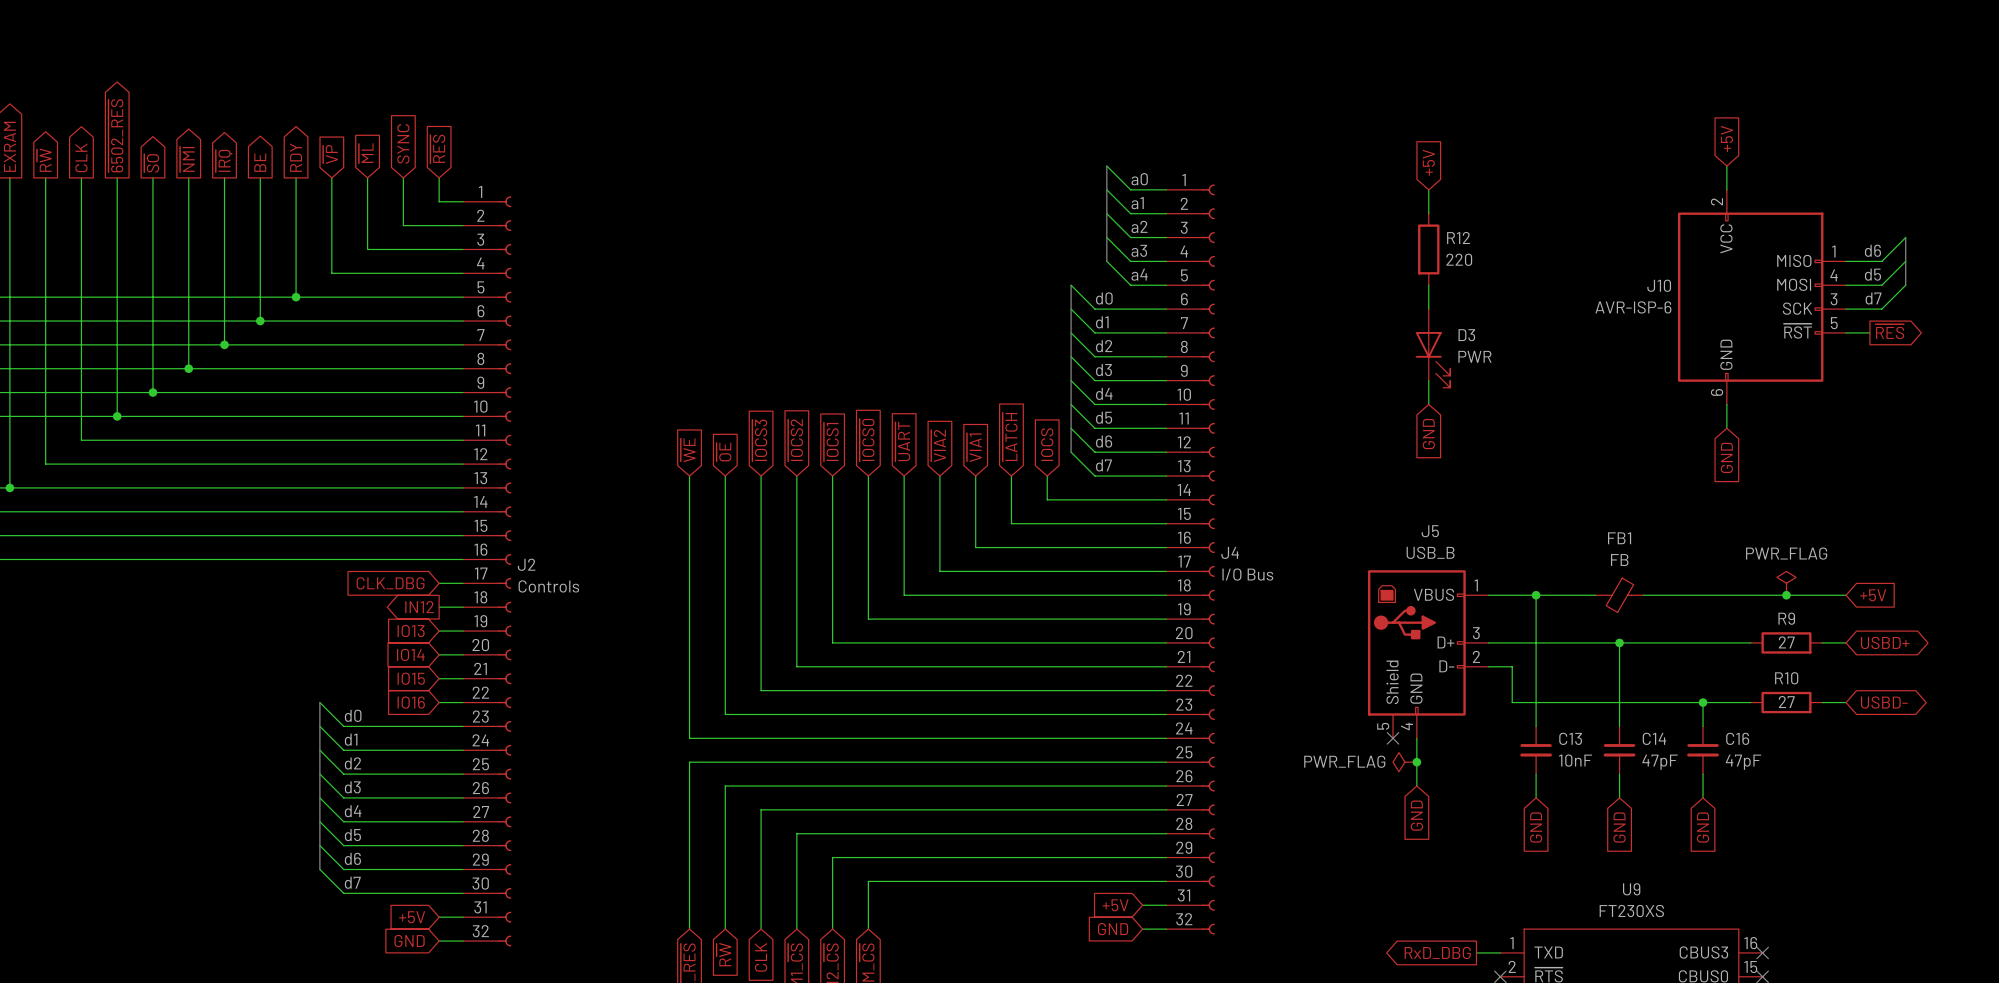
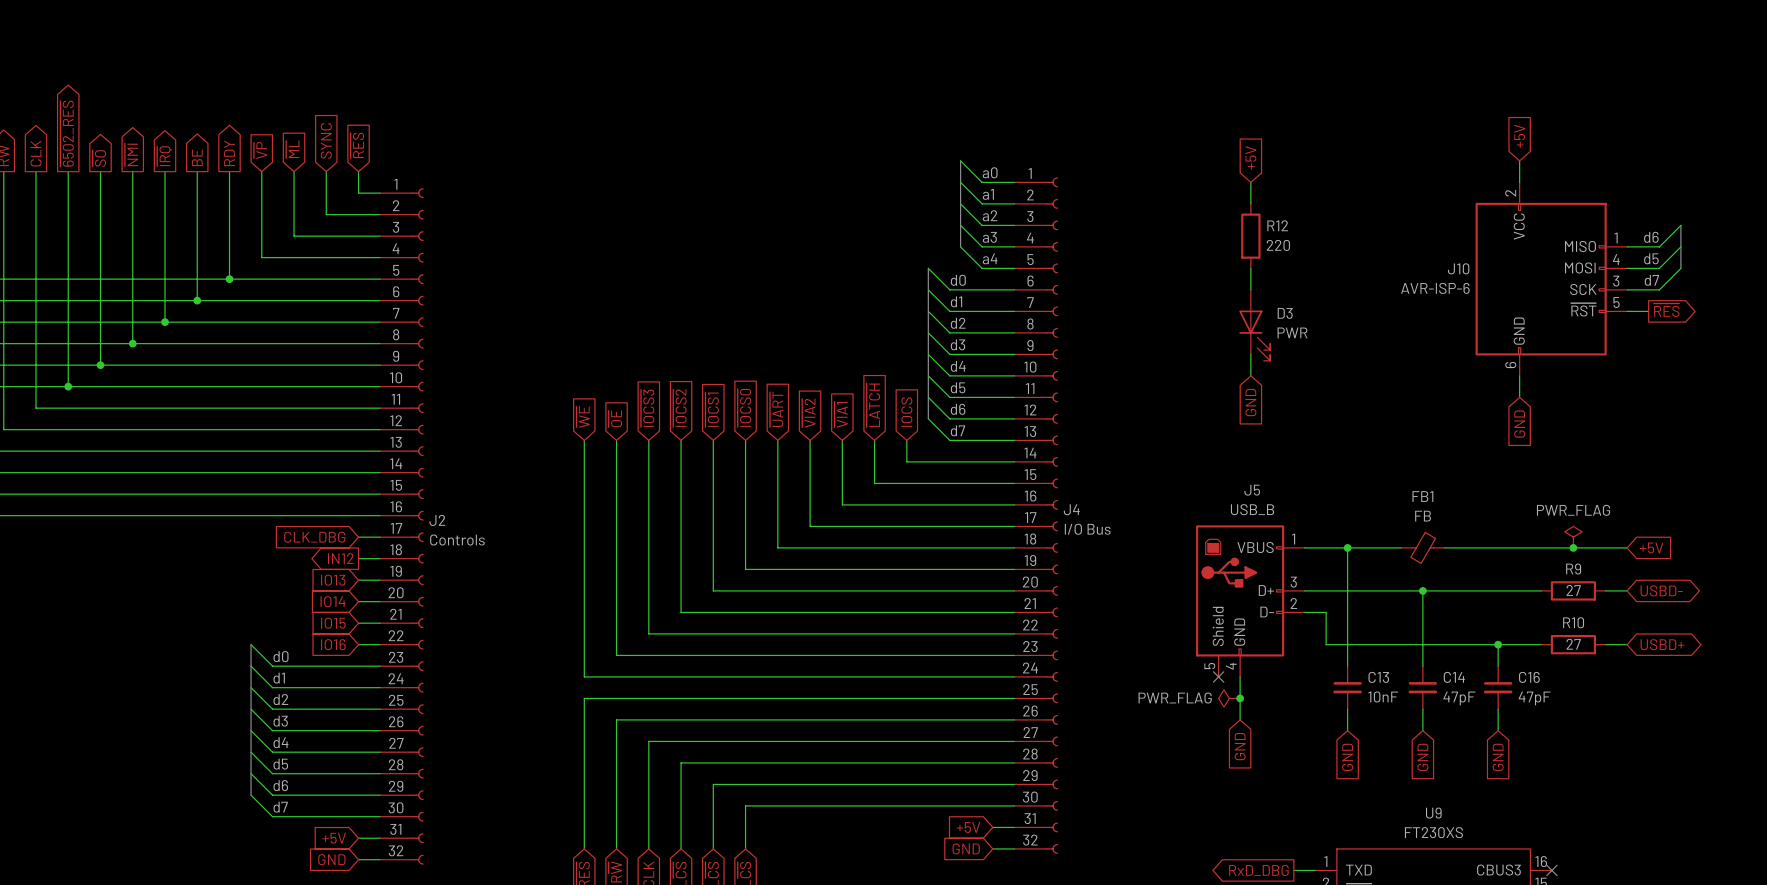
global label: USBD+ (1885, 642) -> USBD- (1661, 590)
global label: USBD- (1884, 702) -> USBD+ (1662, 644)

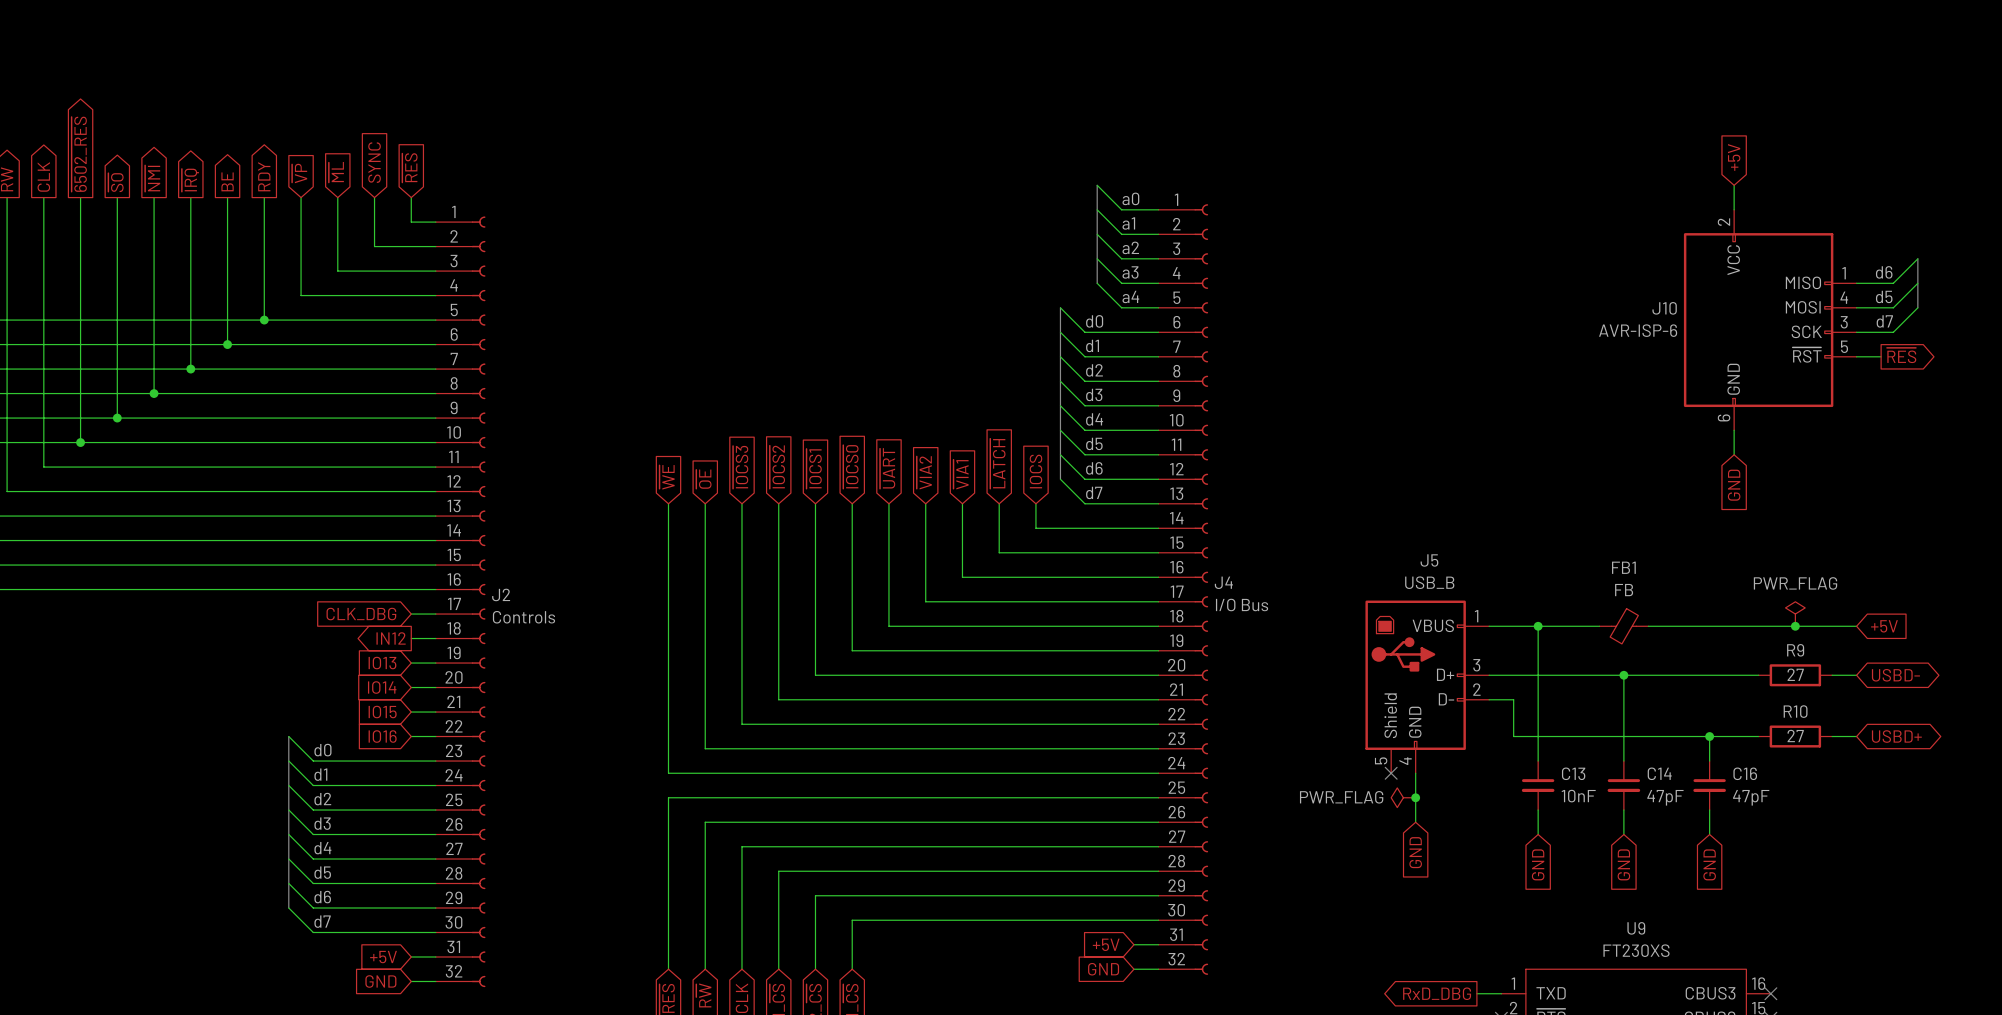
global label: +5V (1250, 157) -> none
wire: (1250, 182) (1250, 203) -> none
R12: 220 (1250, 236) -> none
wire: (1250, 268) (1250, 289) -> none
D3: PWR (1254, 325) -> none
wire: (1250, 354) (1250, 375) -> none
global label: GND (1250, 402) -> none

